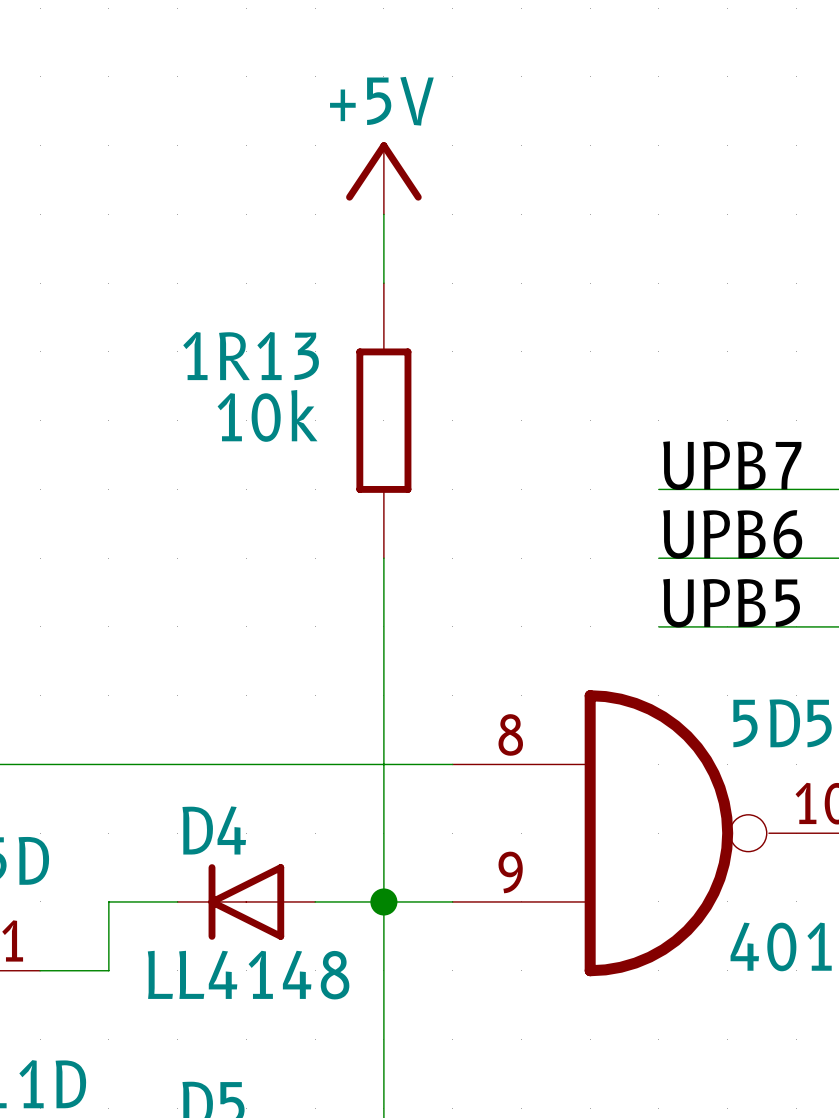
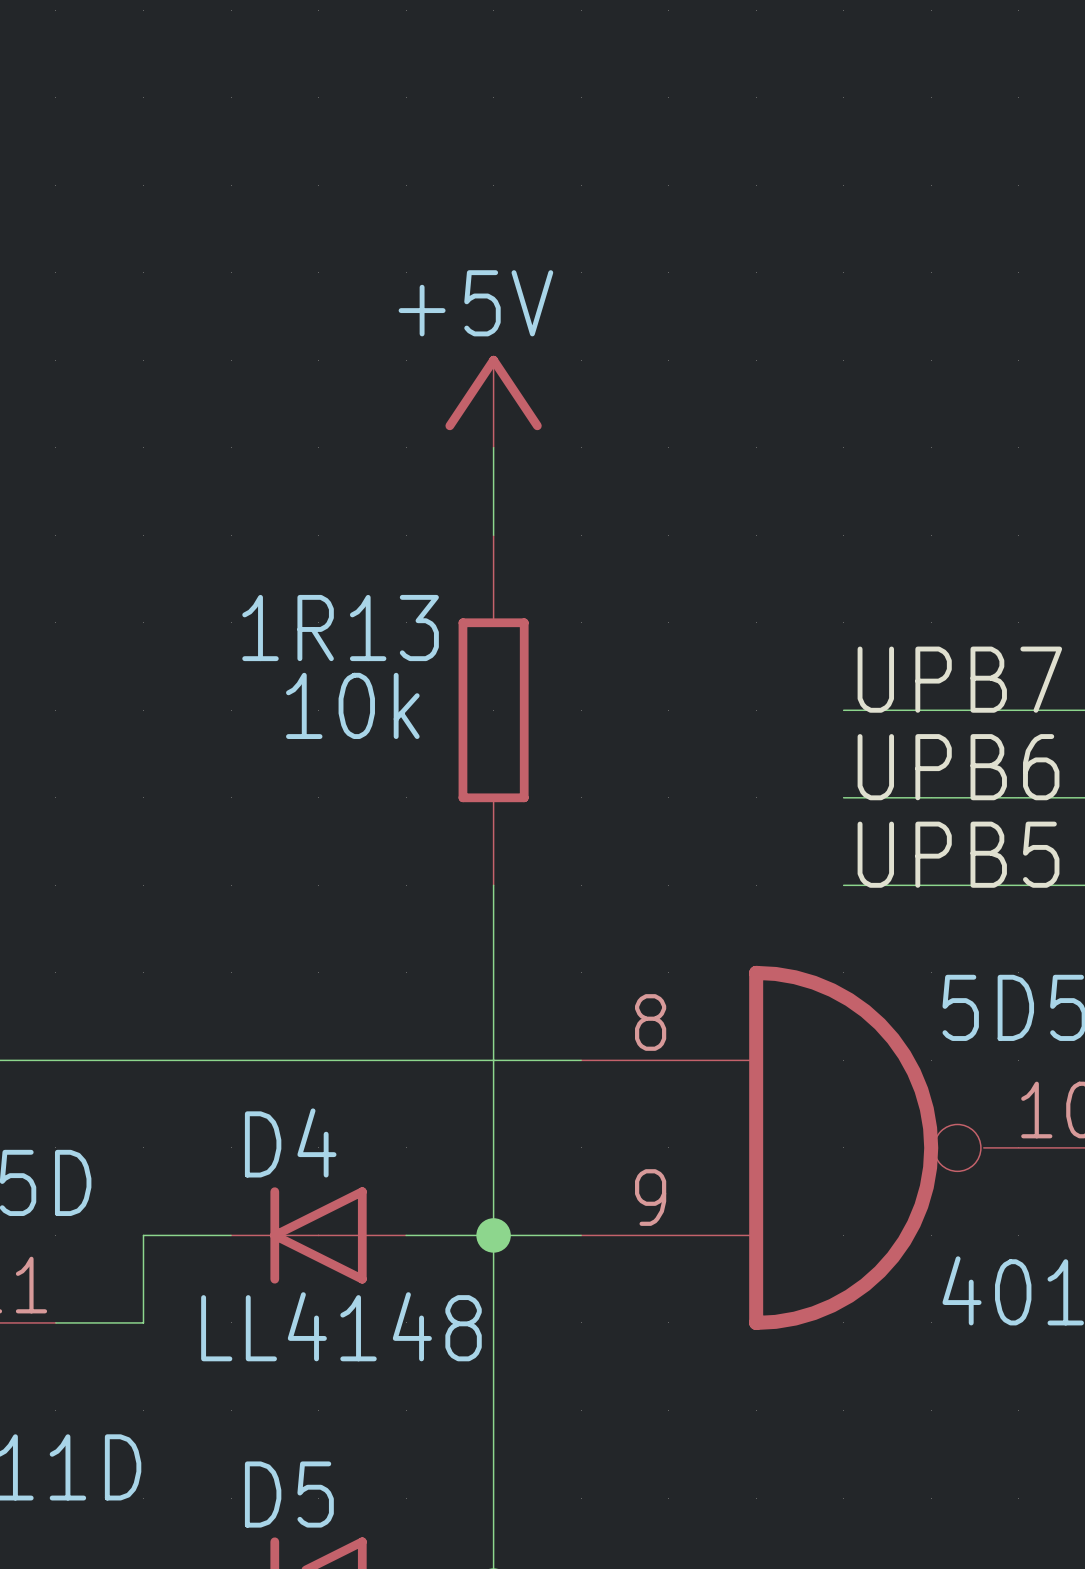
power symbol position: +5V (383, 178) -> +5V (493, 401)
1R13 position: (383, 420) -> (493, 710)

